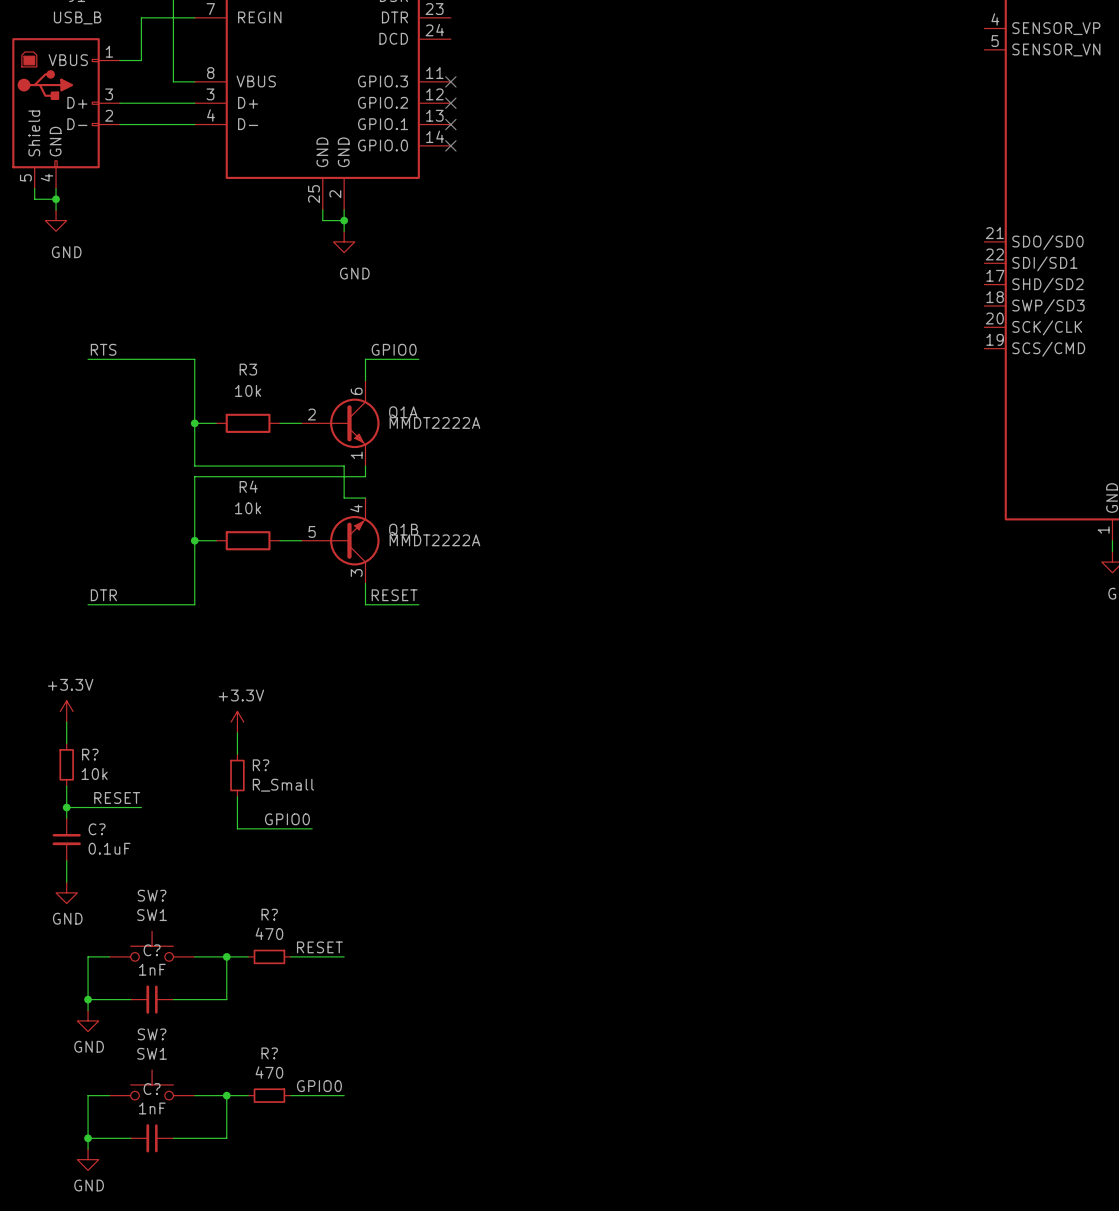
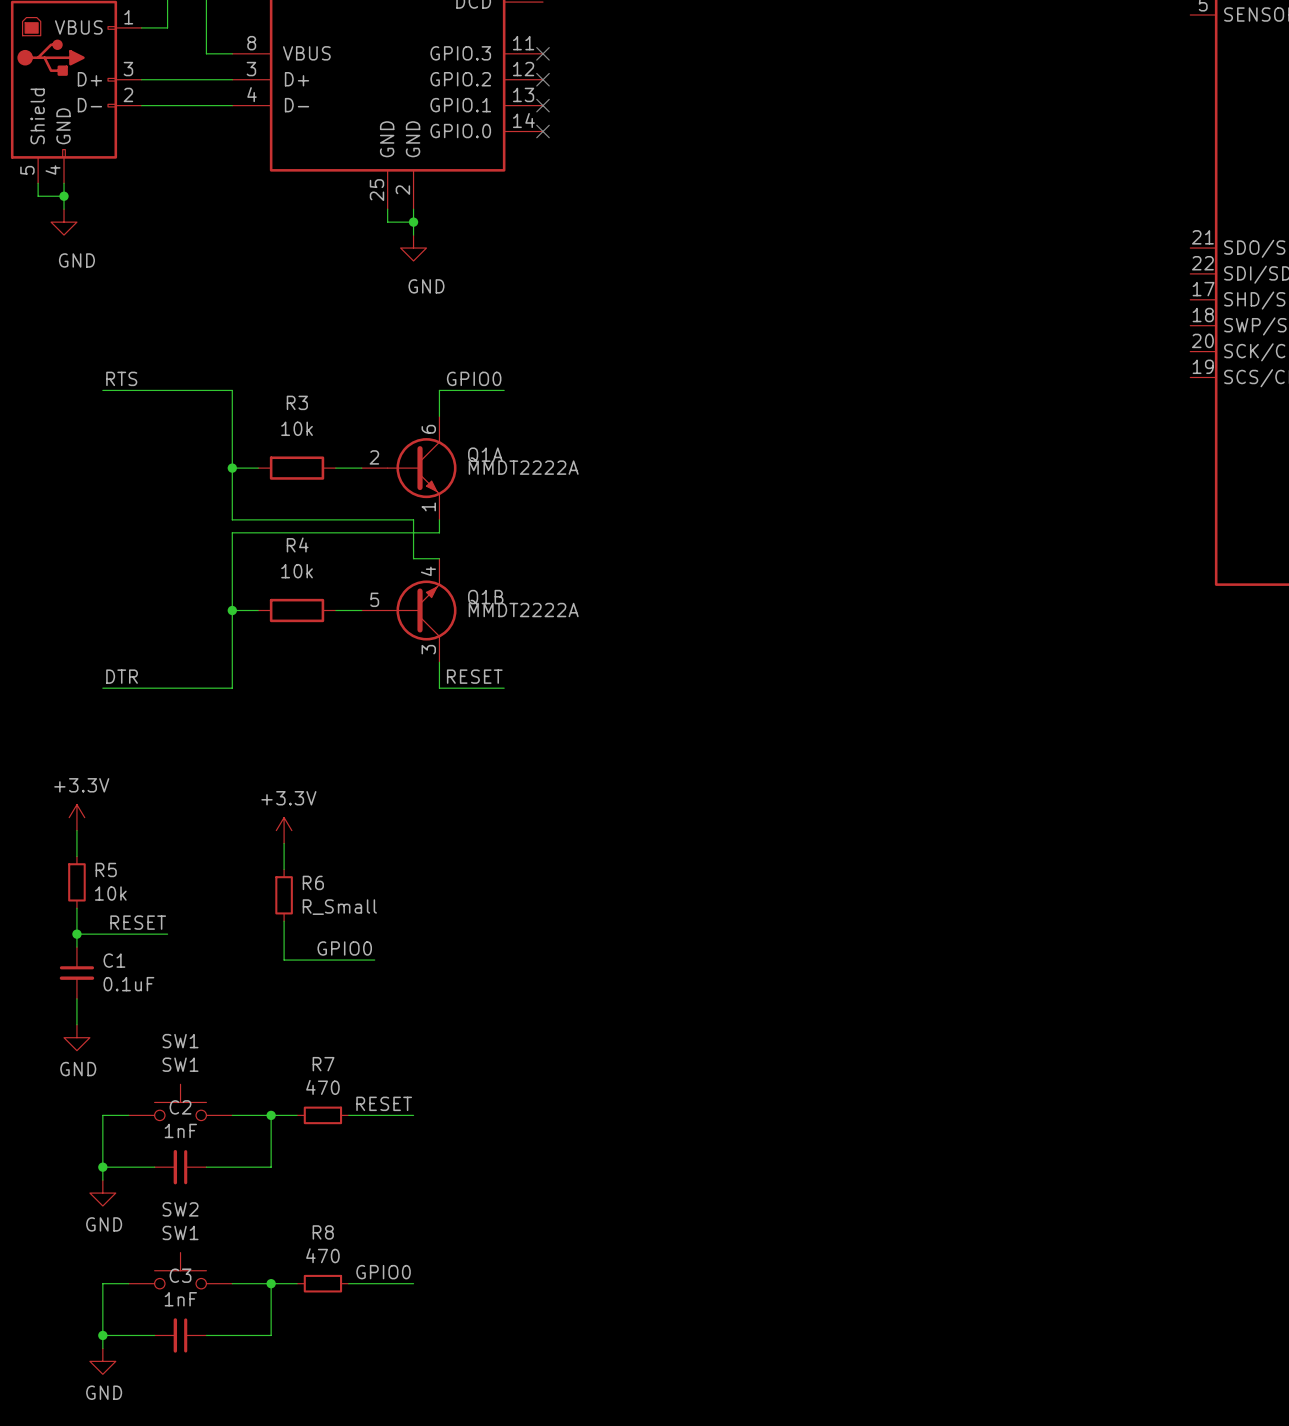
R? name: R? (90, 754) -> R5 (106, 869)
R? name: R? (261, 765) -> R6 (313, 882)
C? name: C? (97, 829) -> C1 (114, 960)
SW? name: SW? (152, 895) -> SW1 (180, 1041)
R? name: R? (269, 914) -> R7 (323, 1064)
C? name: C? (152, 950) -> C2 (180, 1107)
SW? name: SW? (152, 1034) -> SW2 (180, 1209)
R? name: R? (269, 1053) -> R8 (323, 1232)
C? name: C? (152, 1089) -> C3 (180, 1275)

